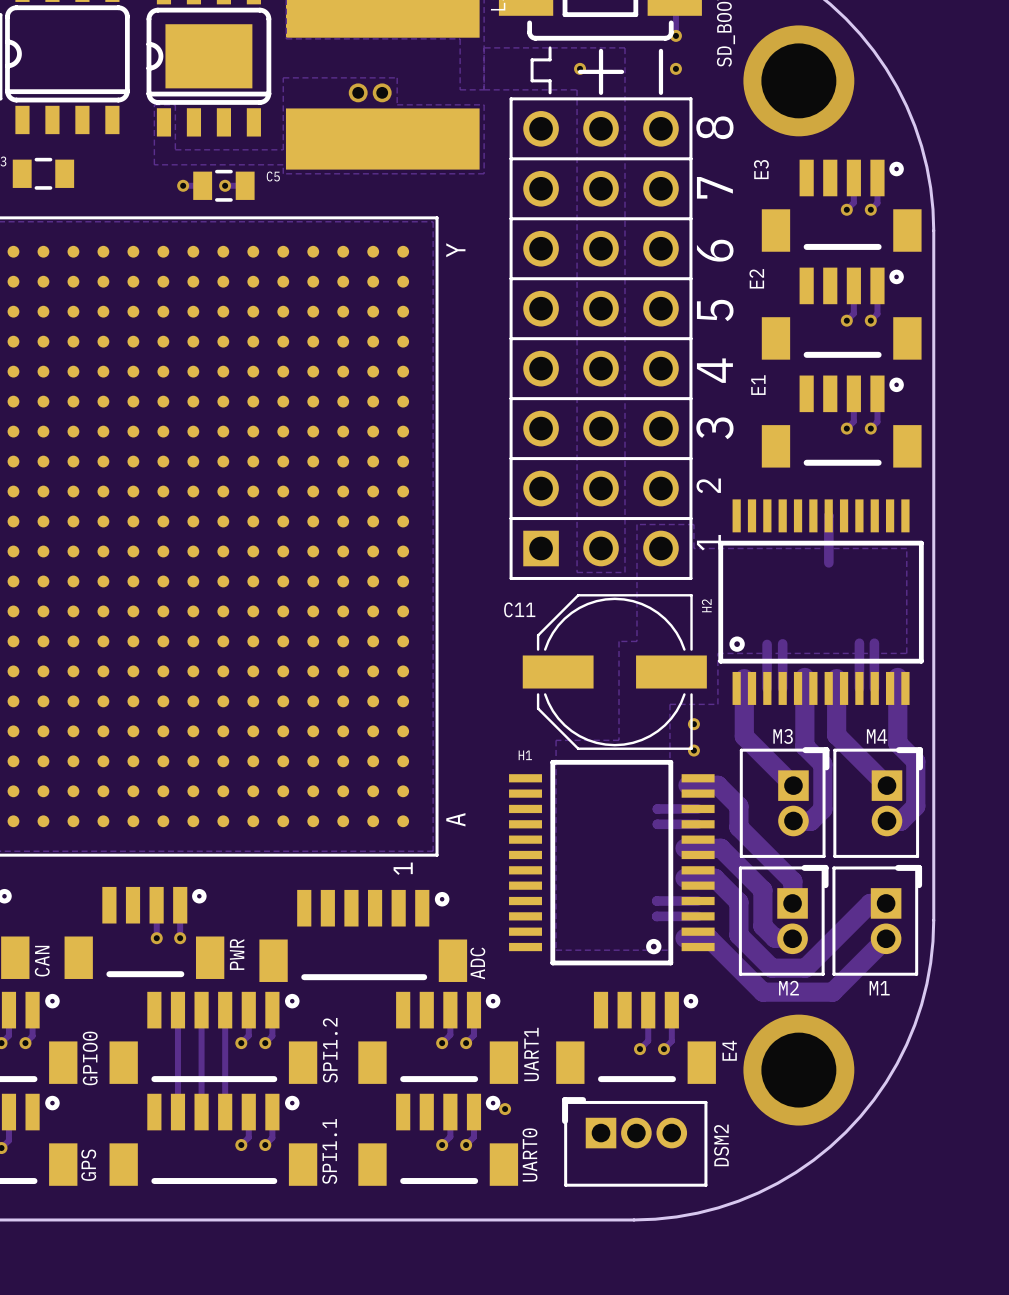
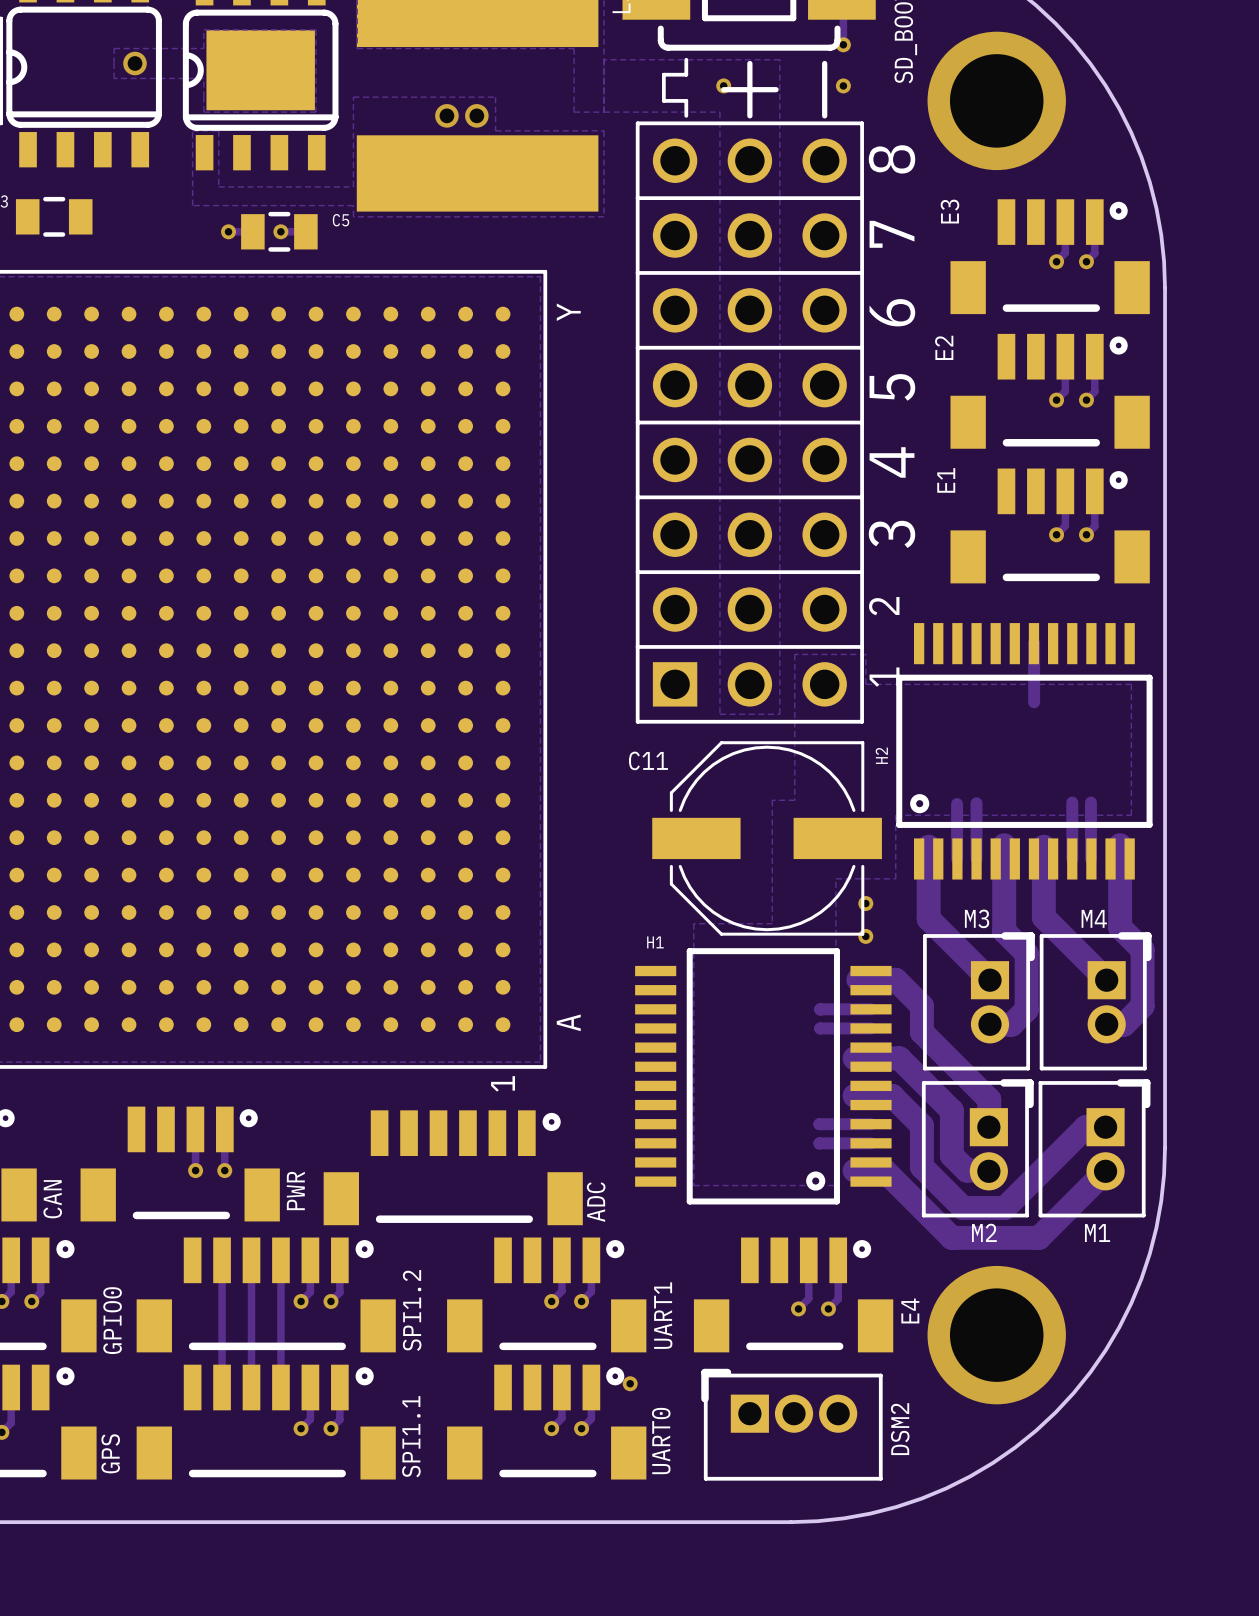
zone outline: none -> (203, 29) (203, 48) (114, 48) (114, 78) (203, 78) (203, 112) (316, 112) (316, 29) (203, 29)
via: none -> (135, 63)

